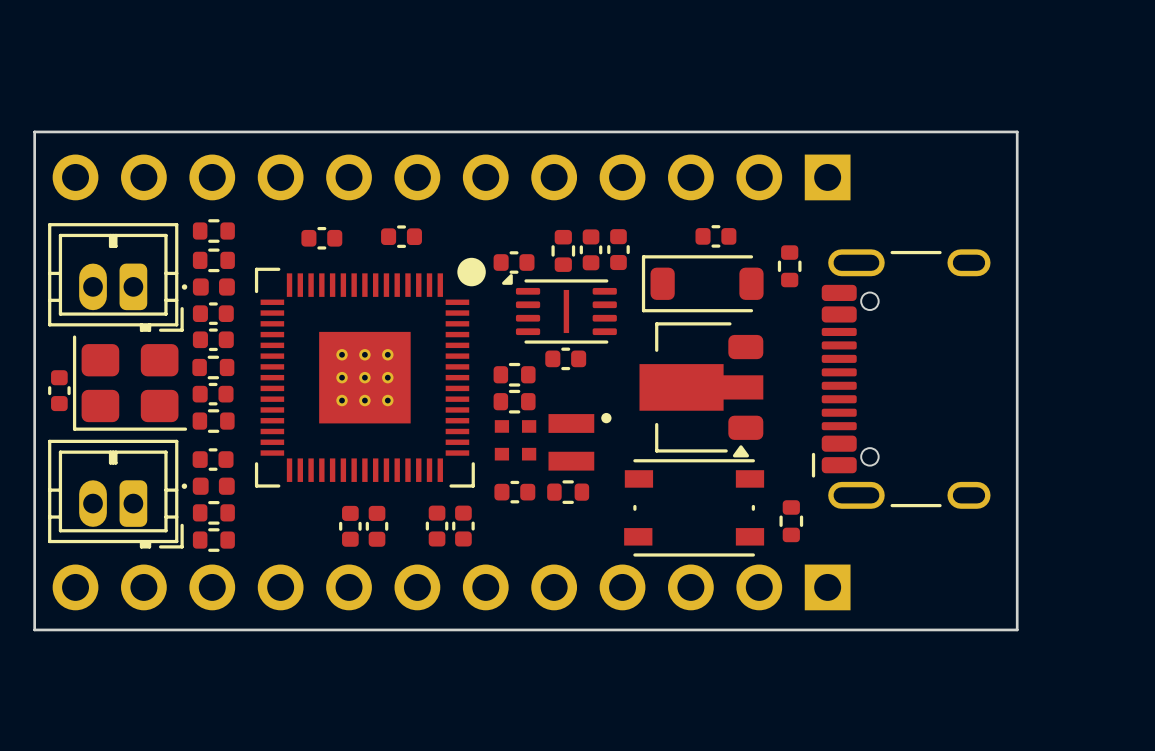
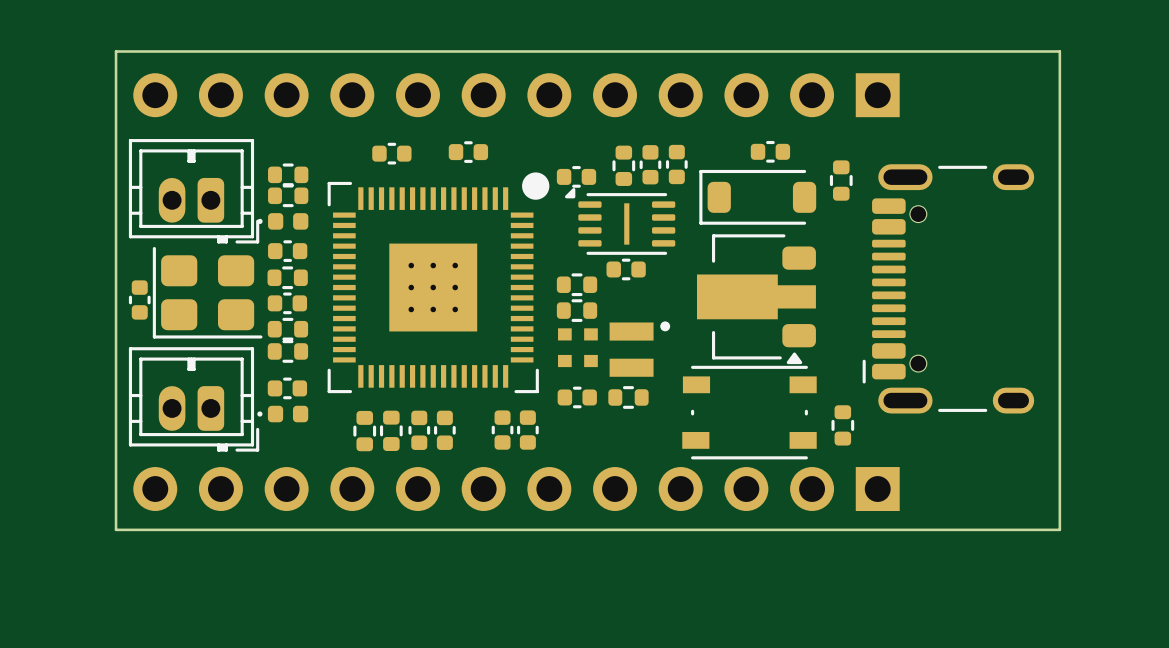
part: (213, 231) -> none
part footprint: [181, 278, 235, 296] -> [268, 184, 309, 208]
part footprint: [192, 302, 234, 325] -> [257, 213, 309, 230]
part: none -> (287, 351)
part: (213, 459) -> none
part footprint: [181, 477, 235, 495] -> [267, 377, 308, 400]
part footprint: [192, 501, 235, 525] -> [257, 405, 309, 423]
part: none -> (391, 430)
part: none -> (364, 431)
part: (213, 540) -> none

